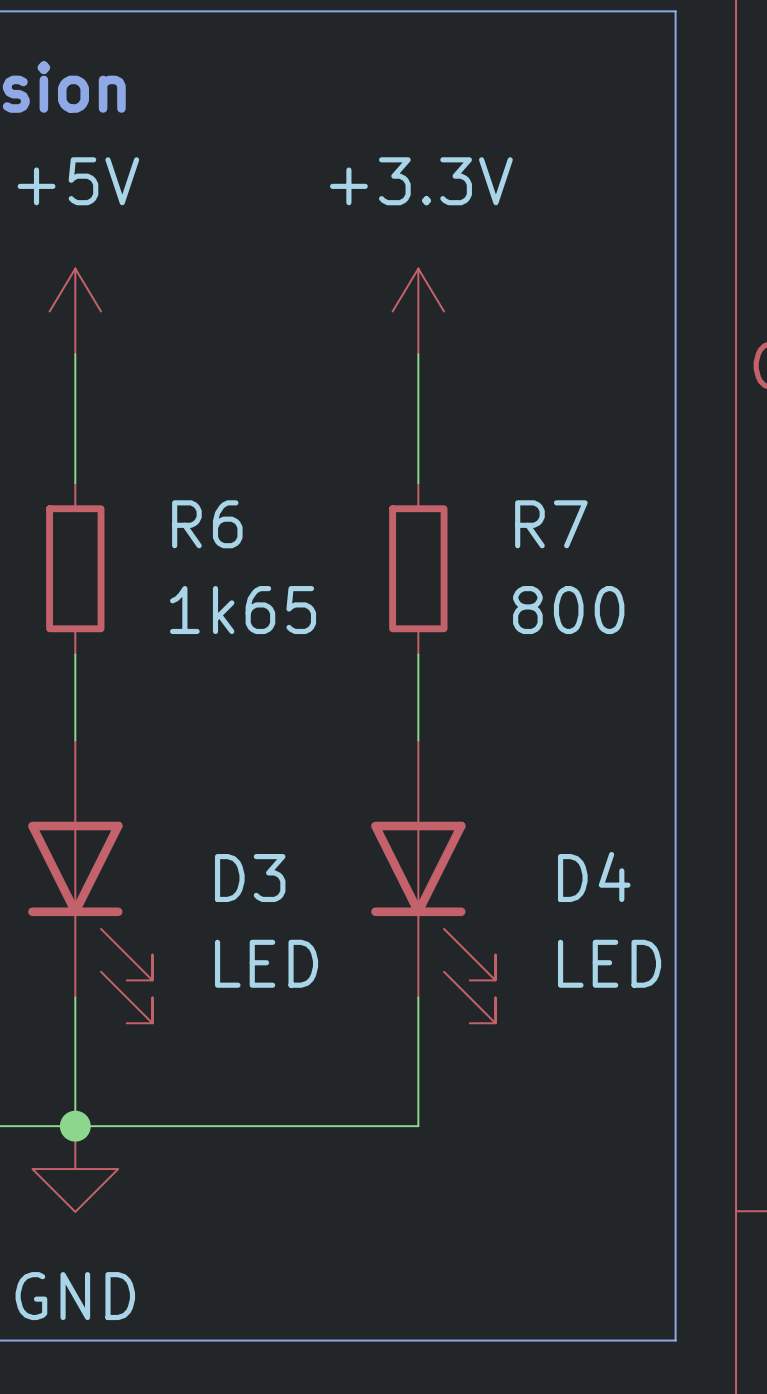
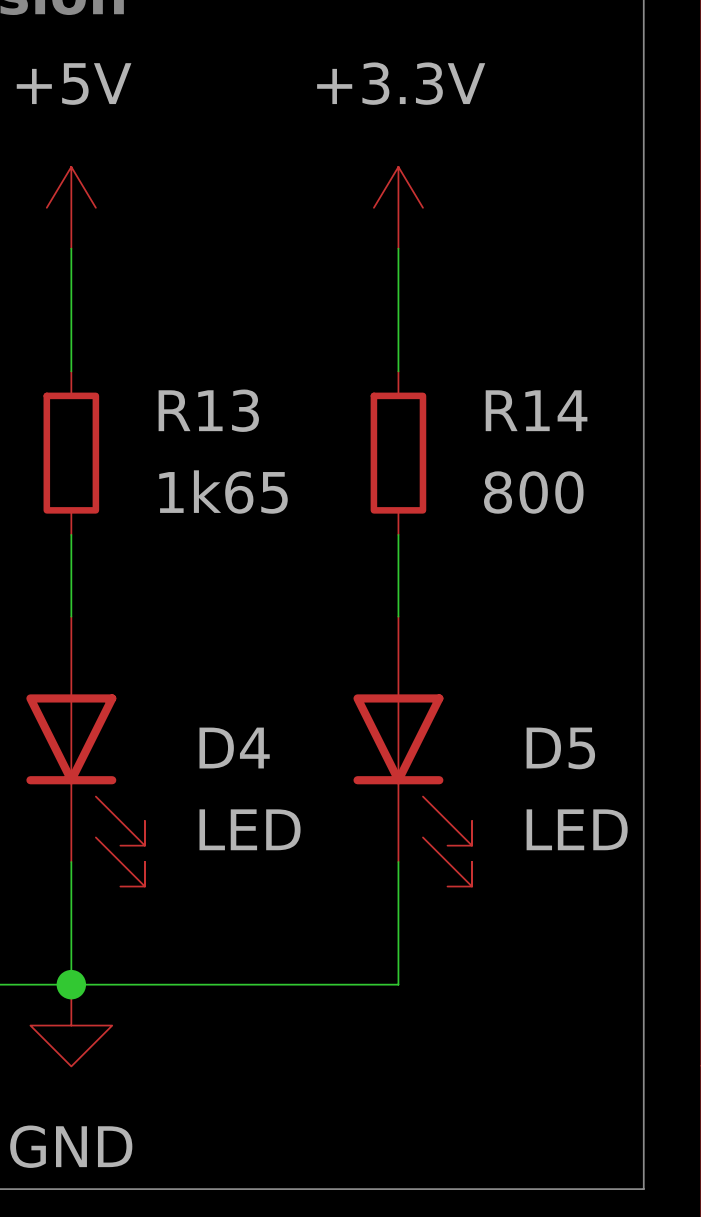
R6 name: R6 (207, 524) -> R13 (208, 410)
R7 name: R7 (551, 524) -> R14 (536, 410)
D4 name: D4 (594, 876) -> D5 (560, 748)
D3 name: D3 (250, 878) -> D4 (234, 748)

